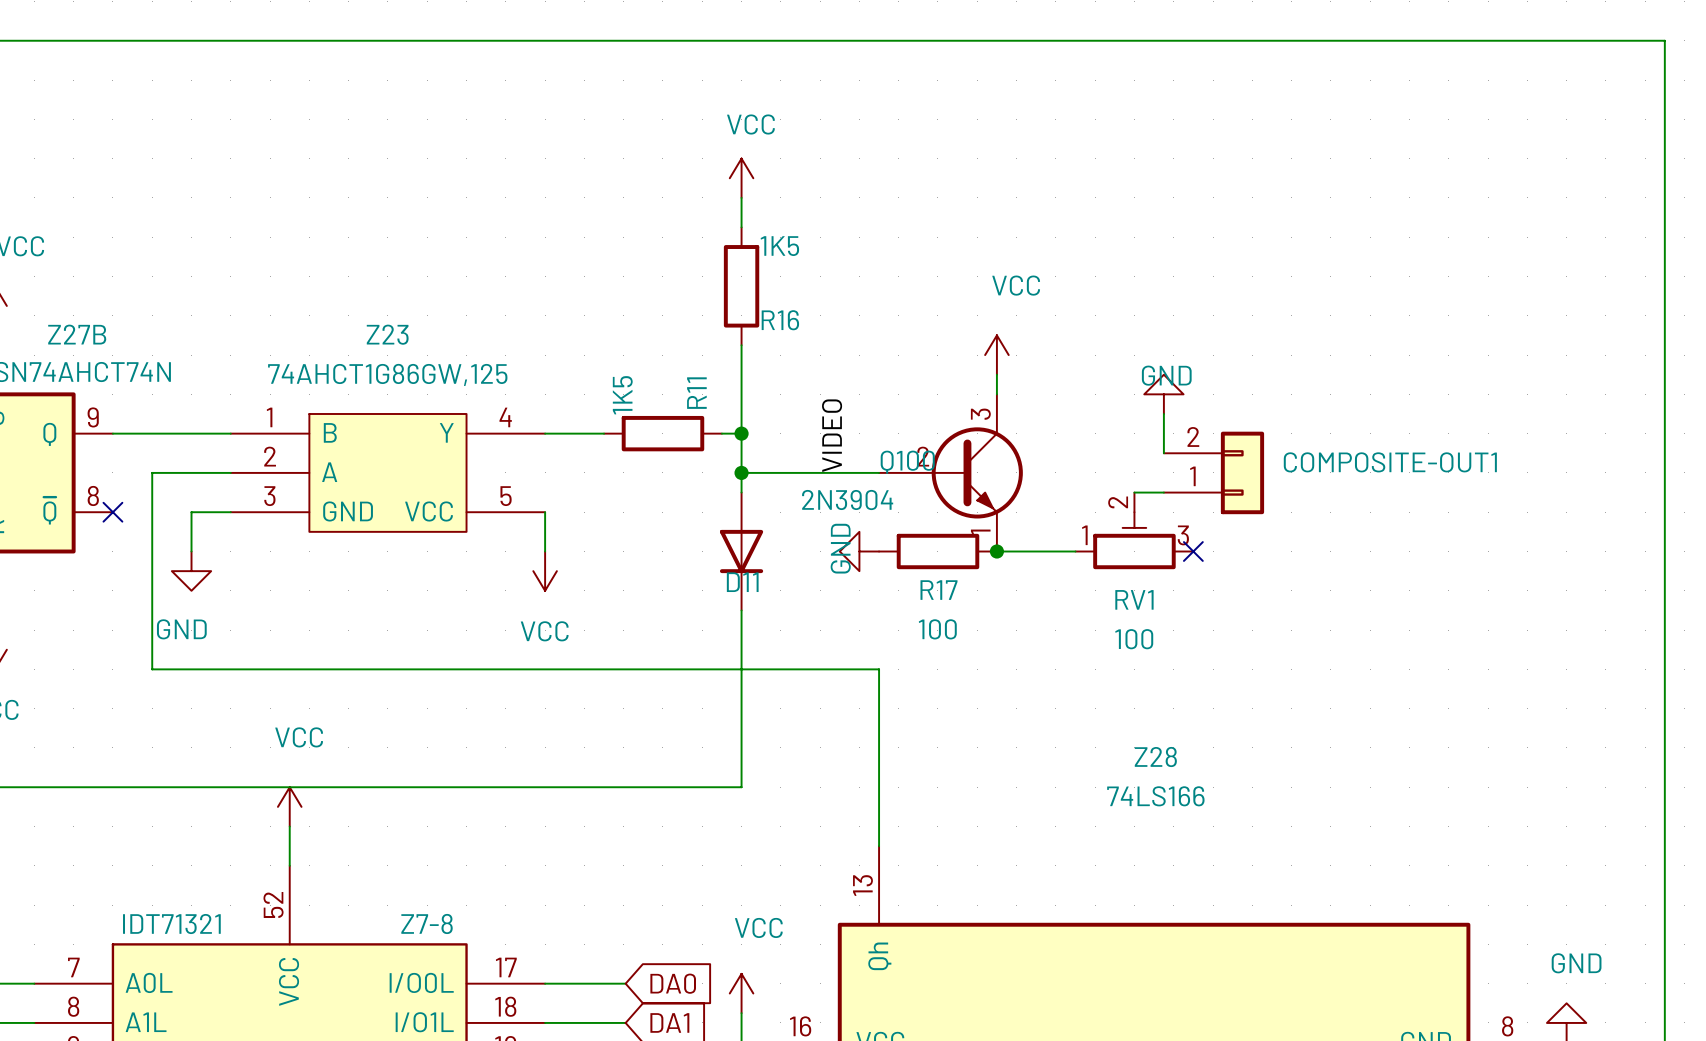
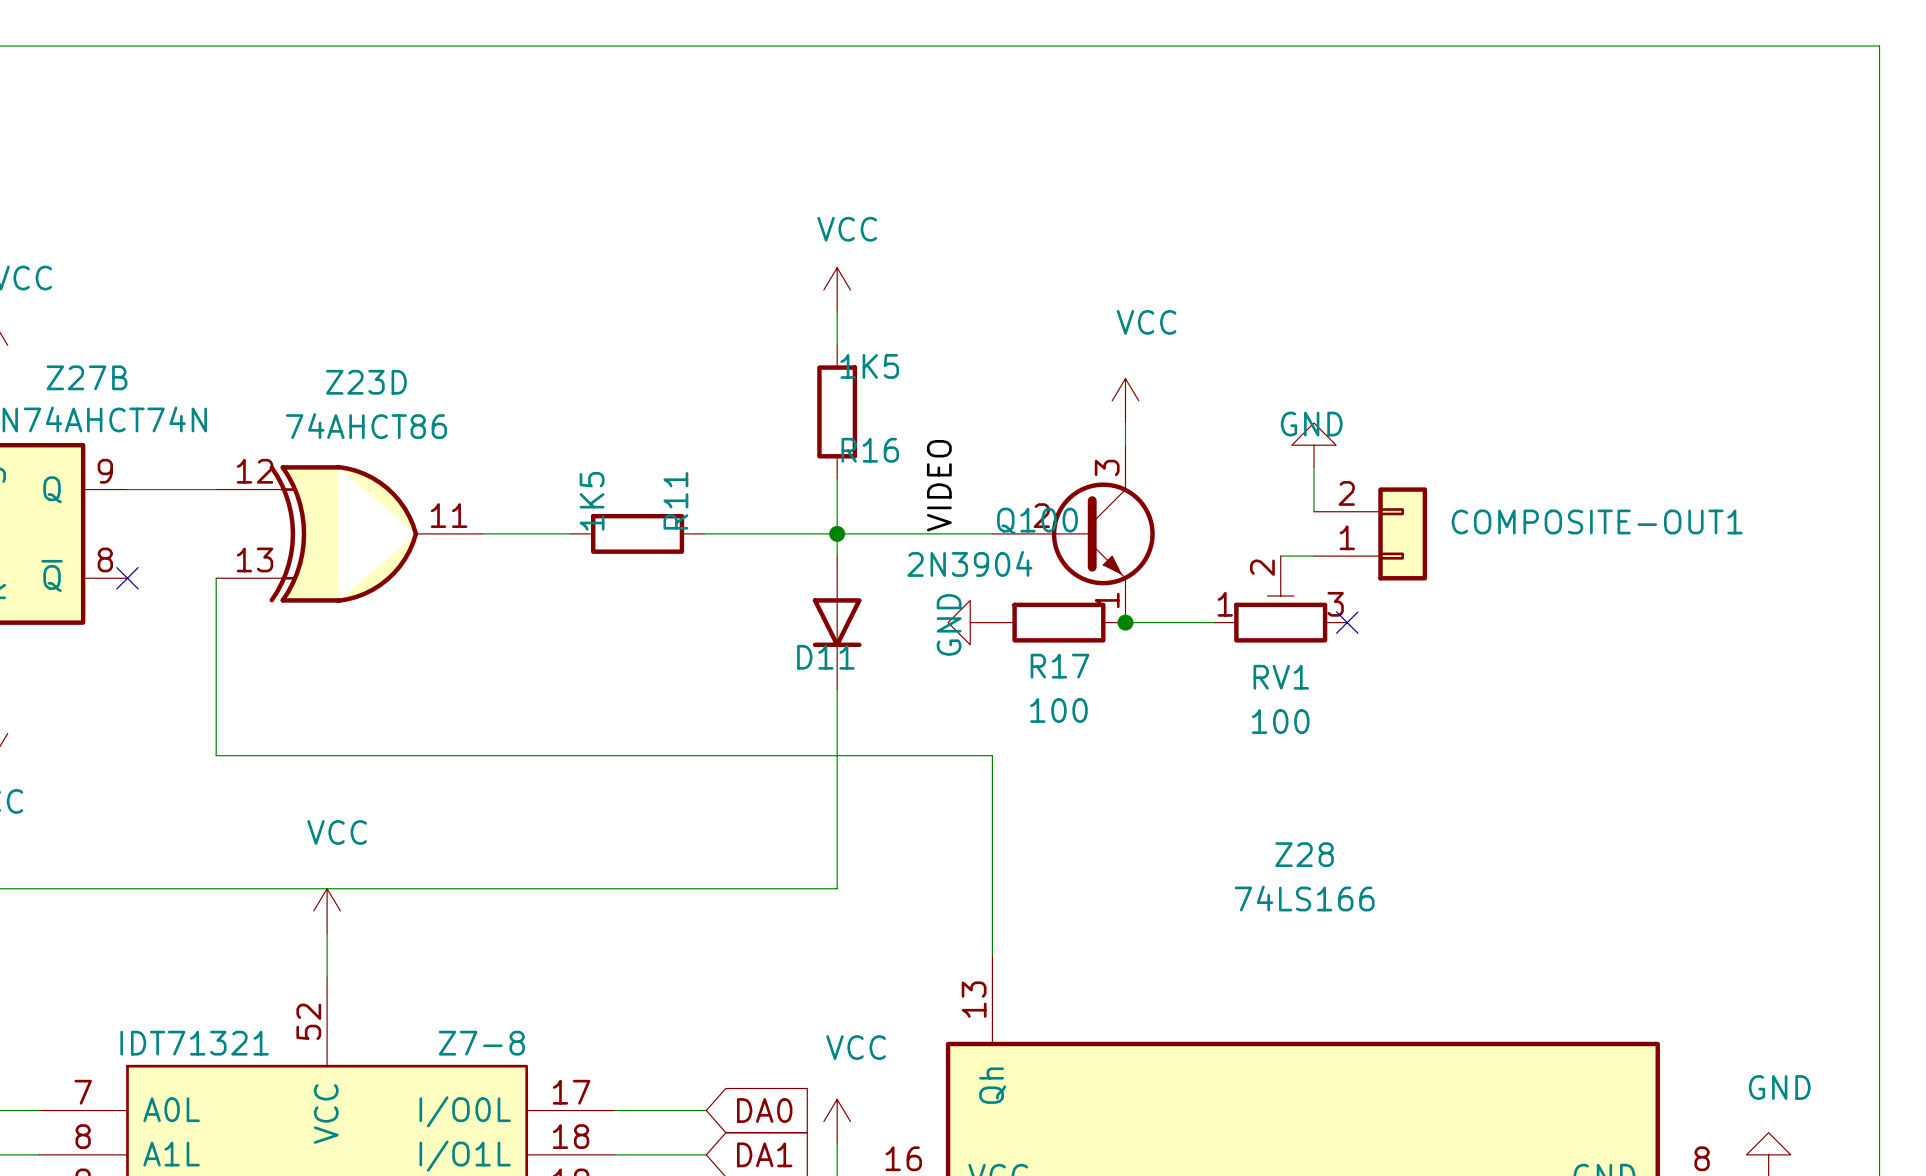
power symbol position: VCC (741, 178) -> VCC (837, 289)
wire: (741, 197) (741, 227) -> (837, 312) (837, 345)
R16 position: (741, 286) -> (837, 411)
wire: (741, 345) (741, 423) -> none
wire: (545, 433) (604, 433) -> none
R11 position: (662, 433) -> (637, 533)
wire: (721, 433) (741, 433) -> none
junction: (741, 433) -> none
wire: (230, 472) (152, 472) (152, 669) (191, 669) -> (216, 622) (216, 755)
Z23D: none -> 74AHCT86 (349, 533)
Z23: 74AHCT1G86GW,125 (387, 472) -> none
wire: none -> (482, 533) (571, 533)
wire: none -> (704, 533) (837, 533)
wire: (545, 512) (545, 551) -> none
power symbol: GND (191, 571) -> none
power symbol: VCC (545, 571) -> none

